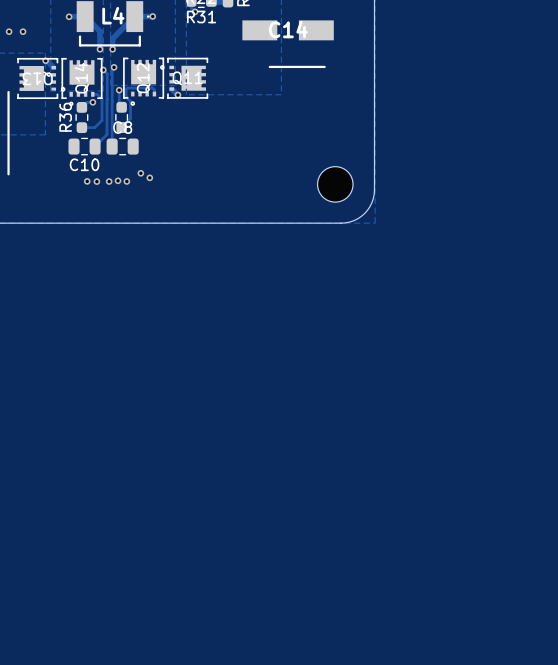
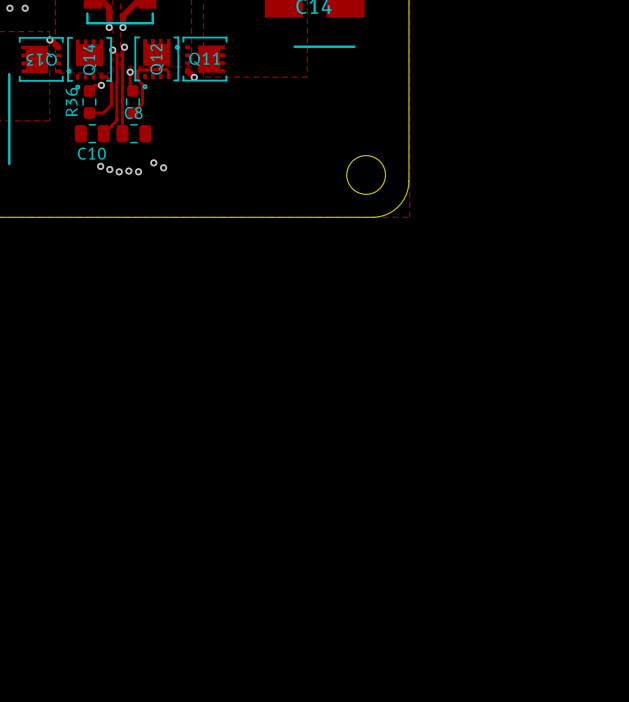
via: none -> (100, 166)
via: none -> (109, 169)
via: (87, 181) -> none
via: (96, 181) -> none

